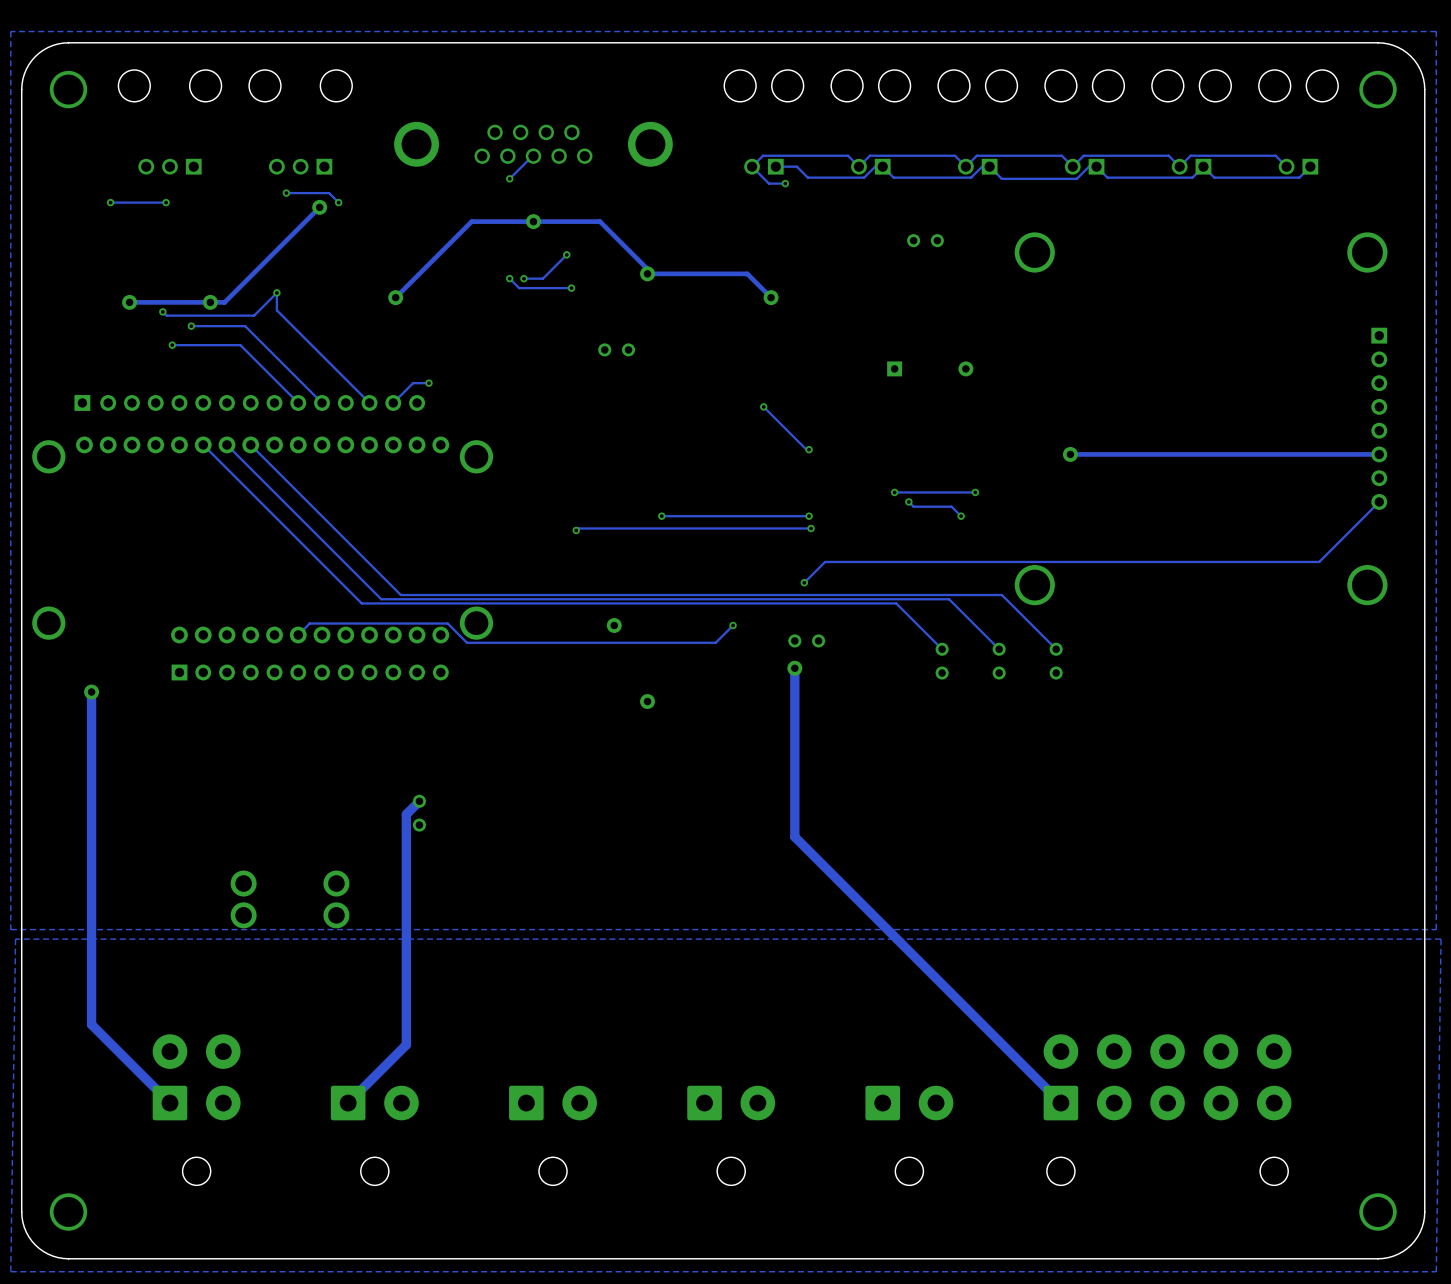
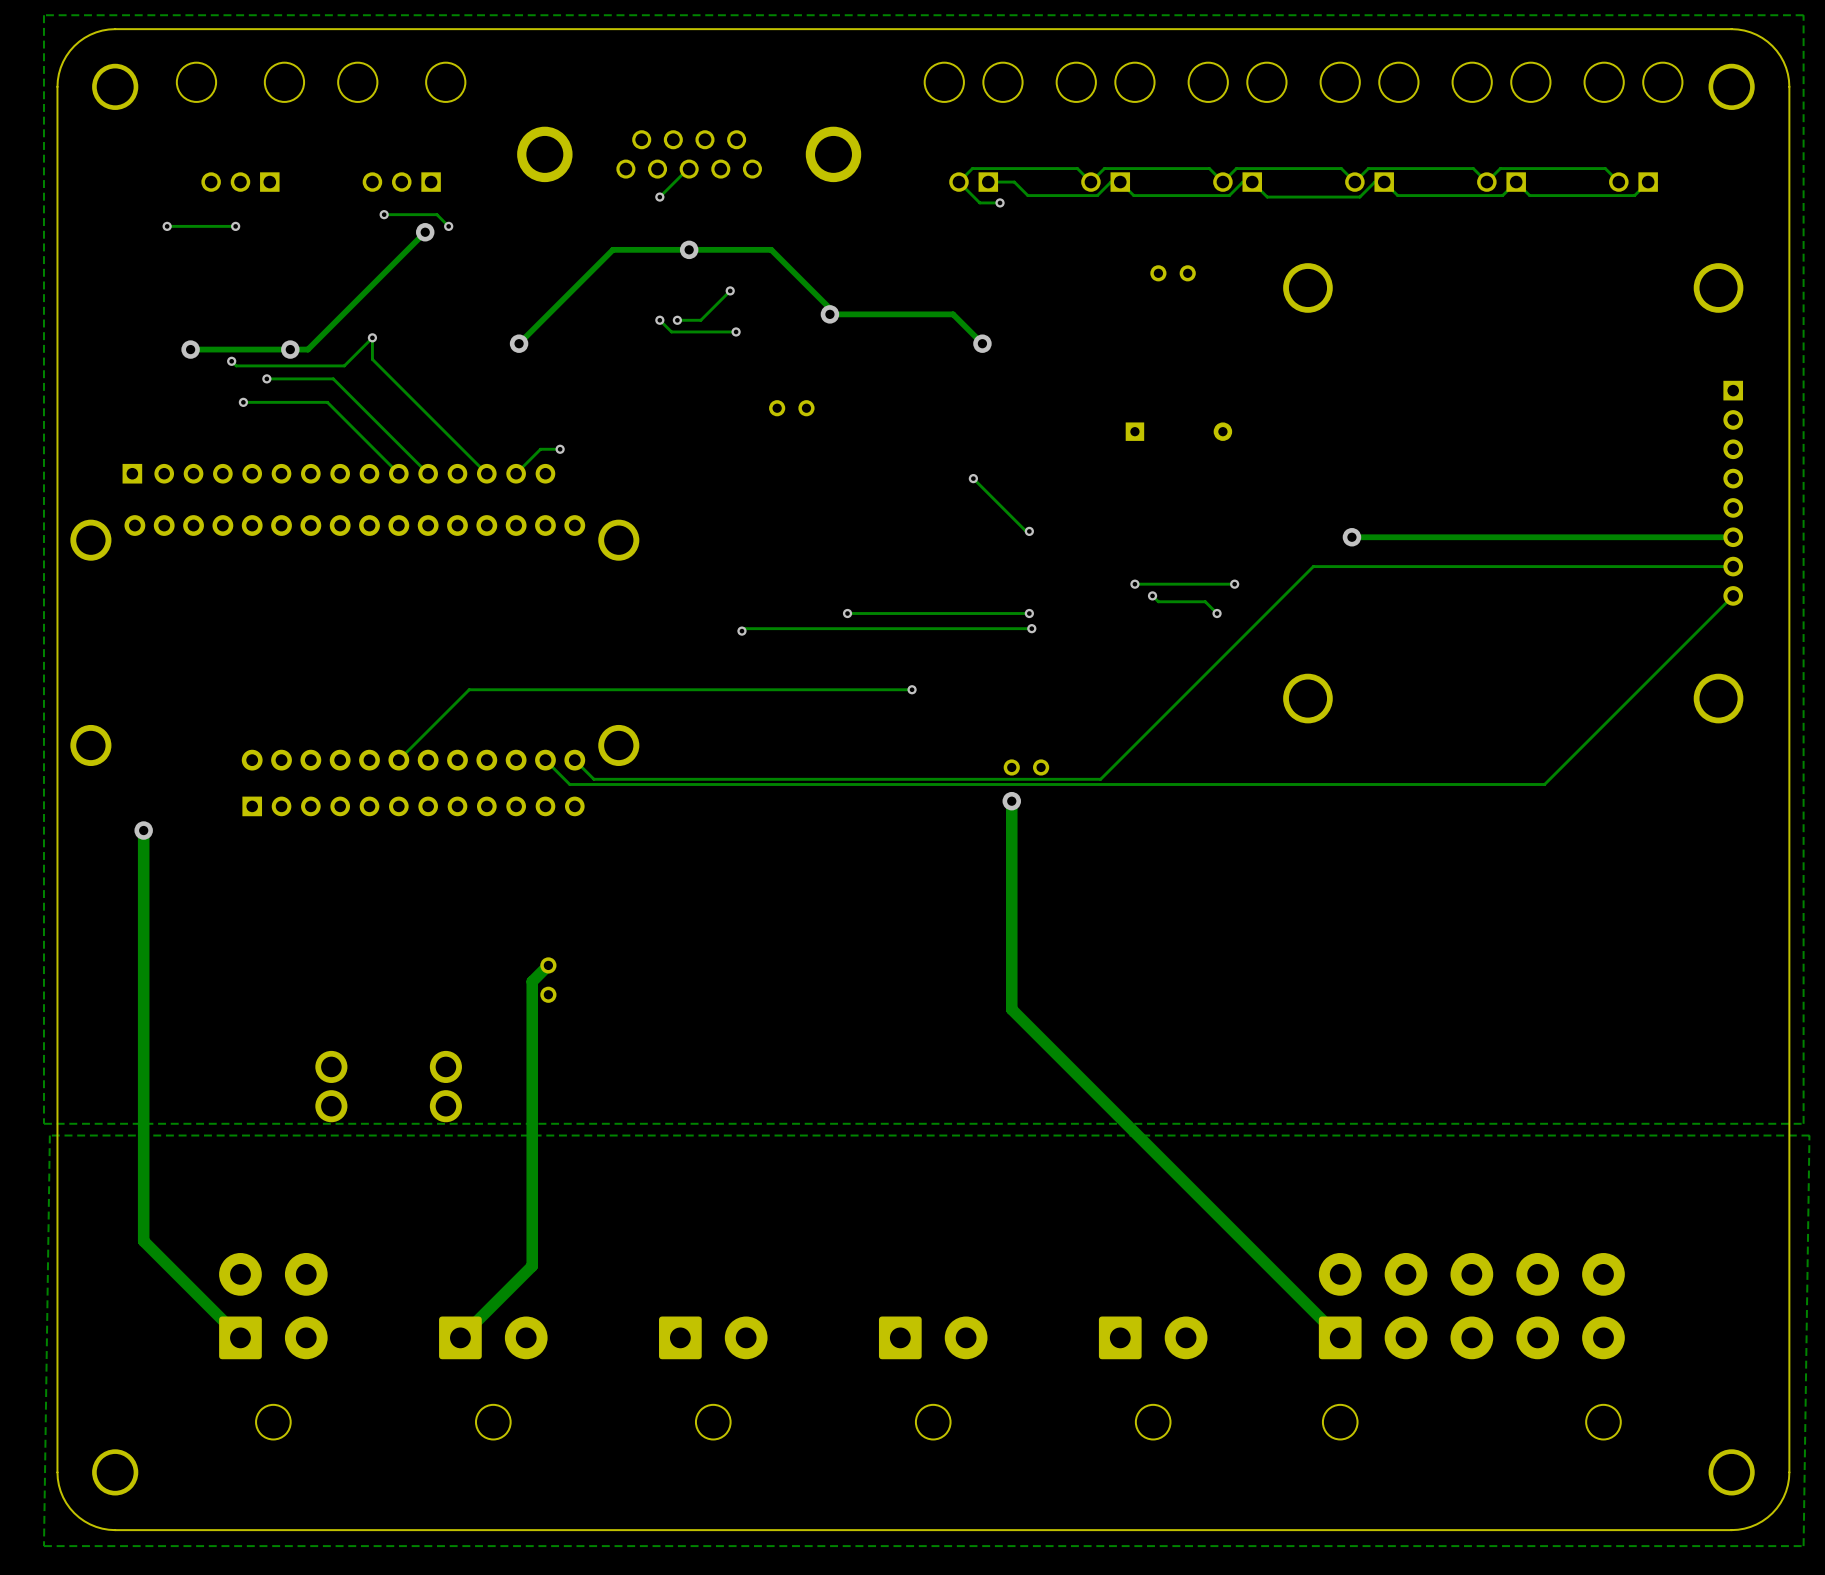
track: (203, 444) (361, 603) (896, 603) (942, 649) -> none
track: (227, 444) (381, 599) (949, 599) (999, 649) -> none
track: (250, 444) (400, 595) (1001, 595) (1056, 649) -> none
track: none -> (1733, 566) (1313, 566) (1100, 779) (593, 779) (574, 760)
track: (1319, 561) (825, 561) (804, 582) -> (1659, 669) (1544, 784) (569, 784) (545, 760)
via: none -> (912, 689)
via: (804, 582) -> none
track: (309, 623) (447, 623) (467, 642) (715, 642) (733, 625) -> (412, 745) (469, 689) (912, 689)
via: (614, 625) -> none
via: (733, 625) -> none
part: (942, 661) -> none
part: (999, 661) -> none
part: (1056, 661) -> none
via: (647, 701) -> none

